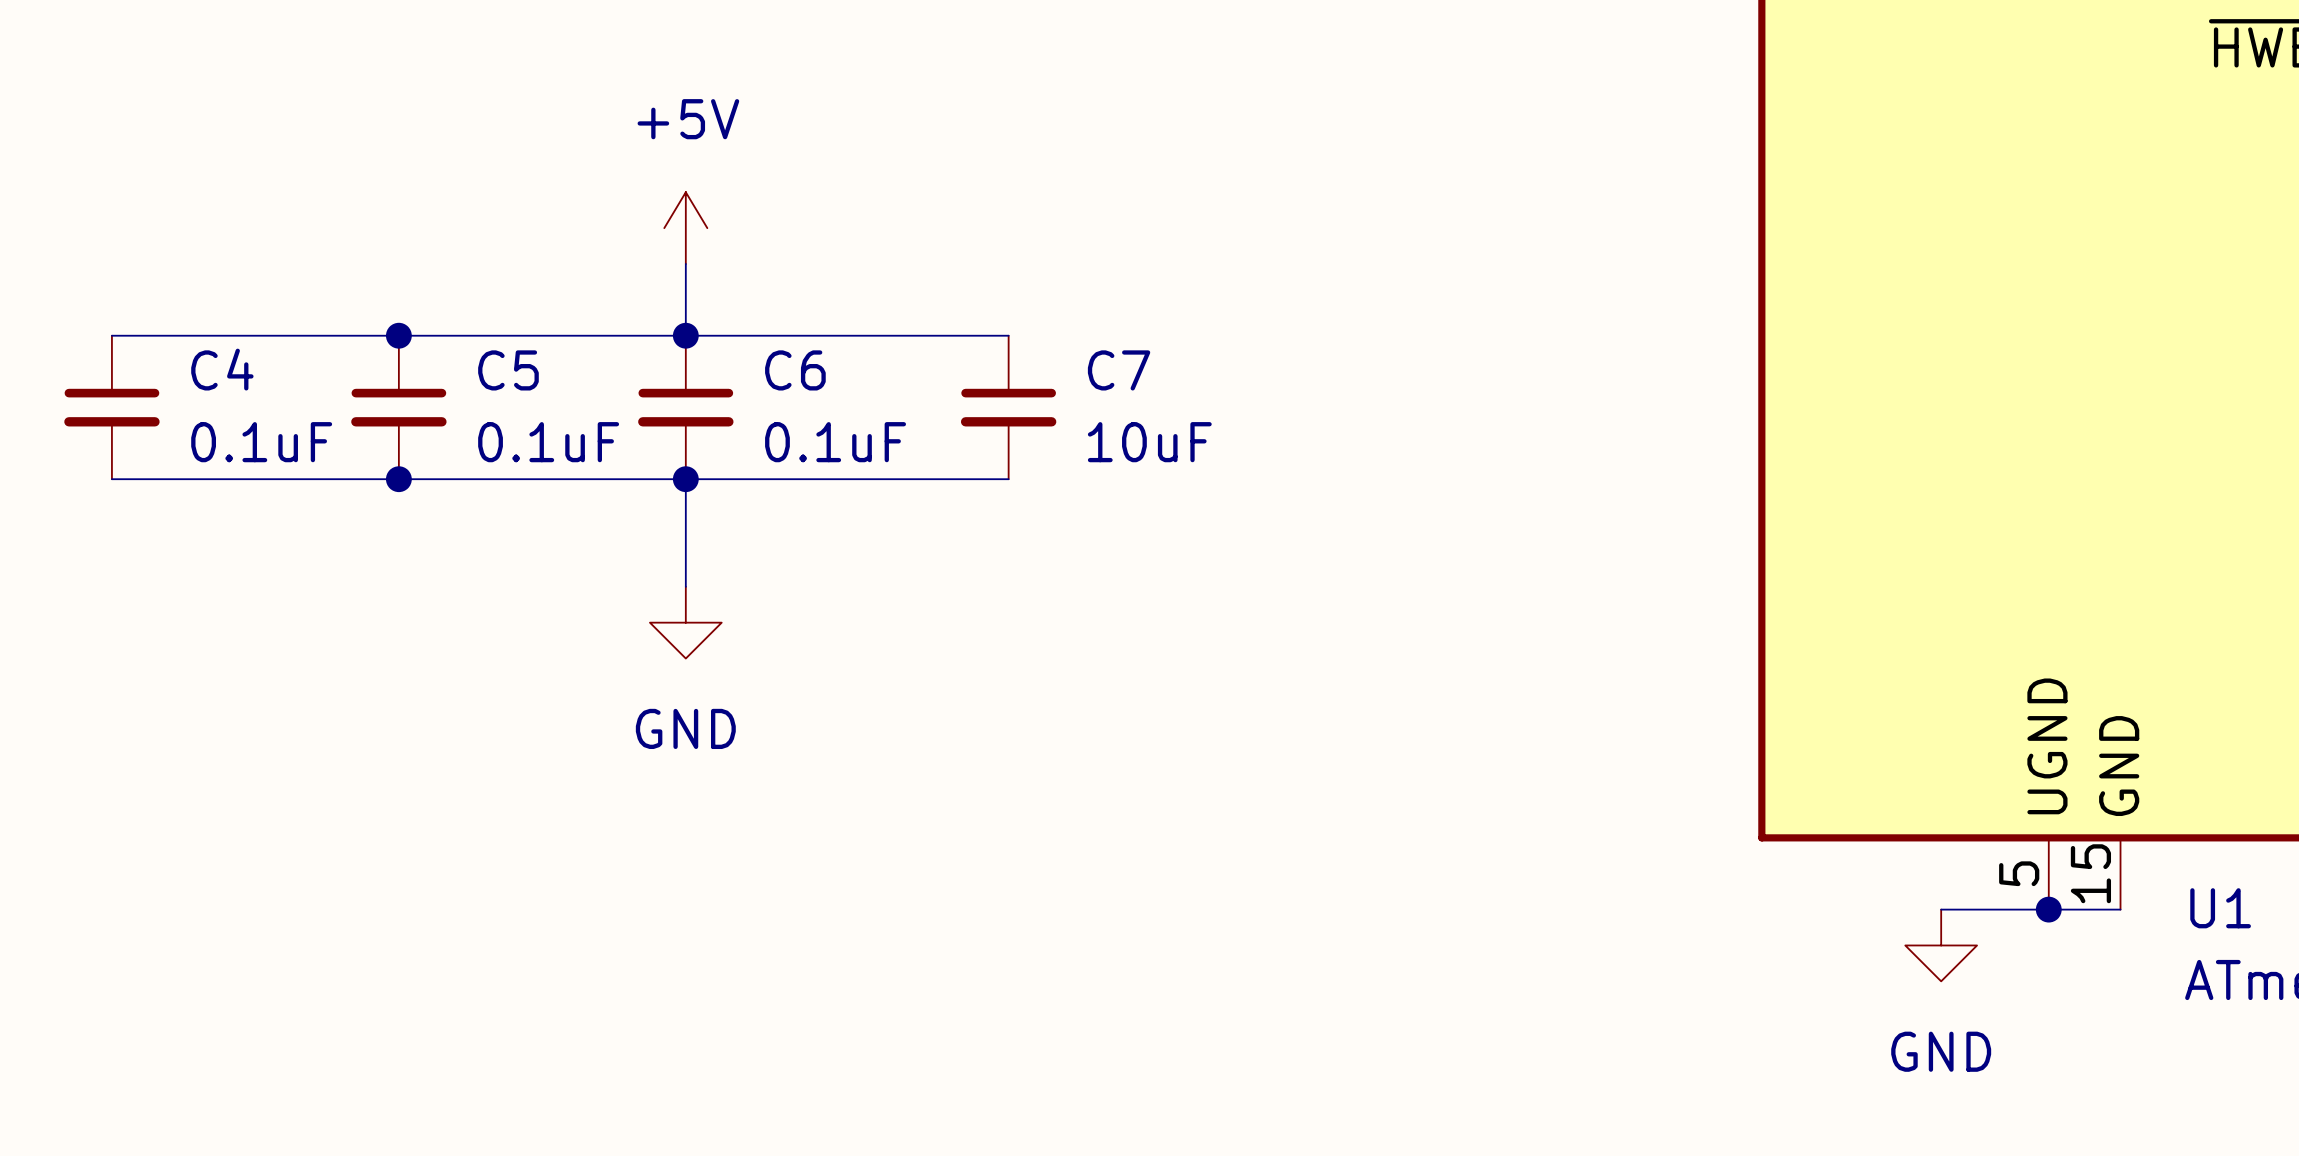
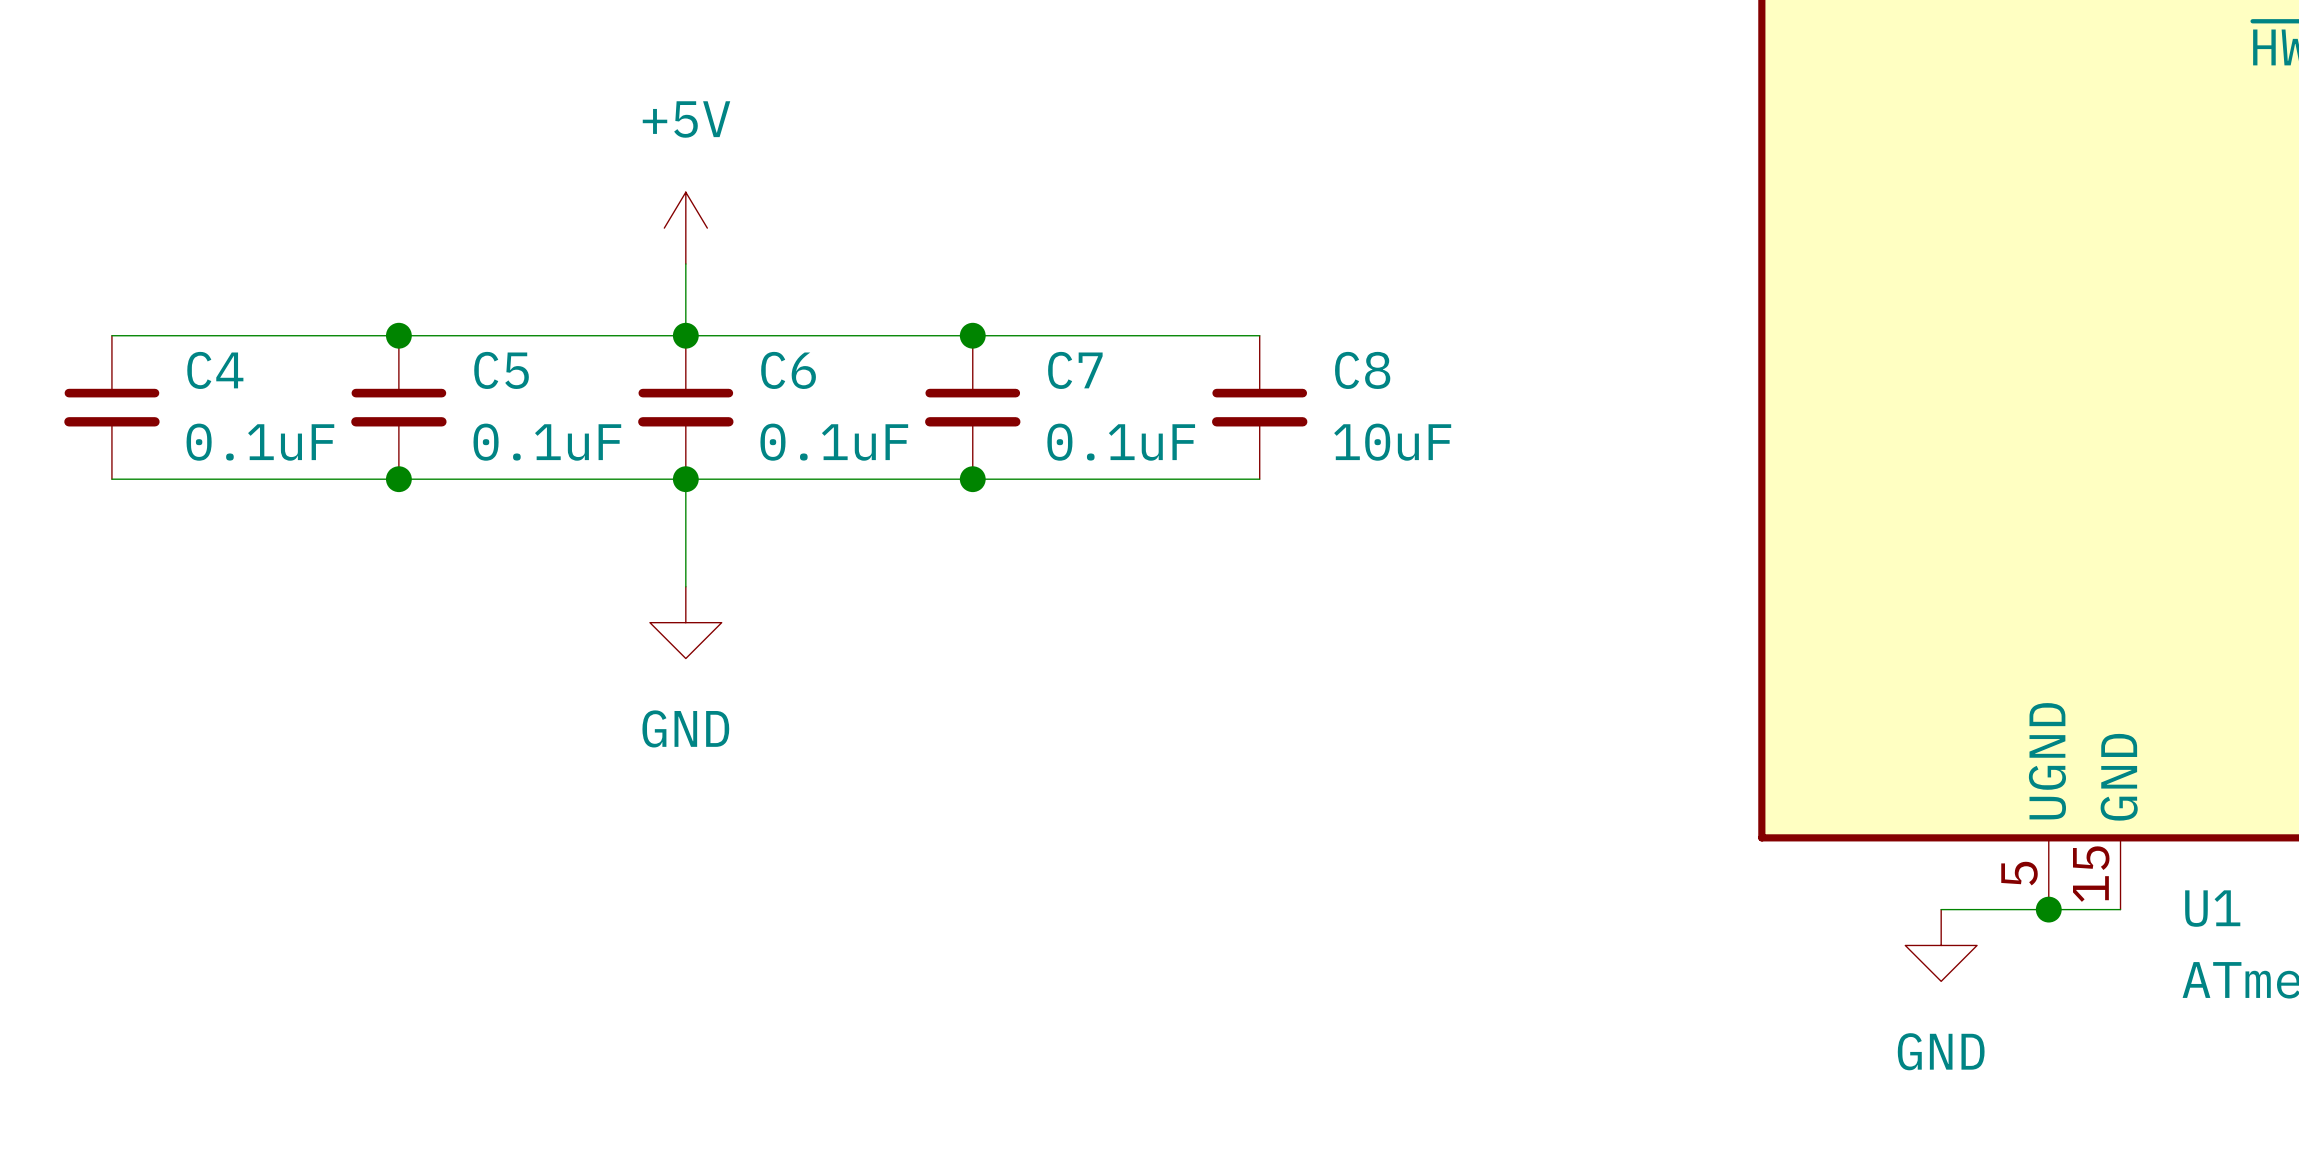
junction: none -> (972, 335)
wire: none -> (1008, 335) (1259, 335)
C7 position: (1008, 407) -> (972, 407)
C8: none -> 10uF (1259, 407)
C7 value: 10uF (1149, 442) -> 0.1uF (1121, 442)
junction: none -> (972, 479)
wire: none -> (1008, 479) (1259, 479)

